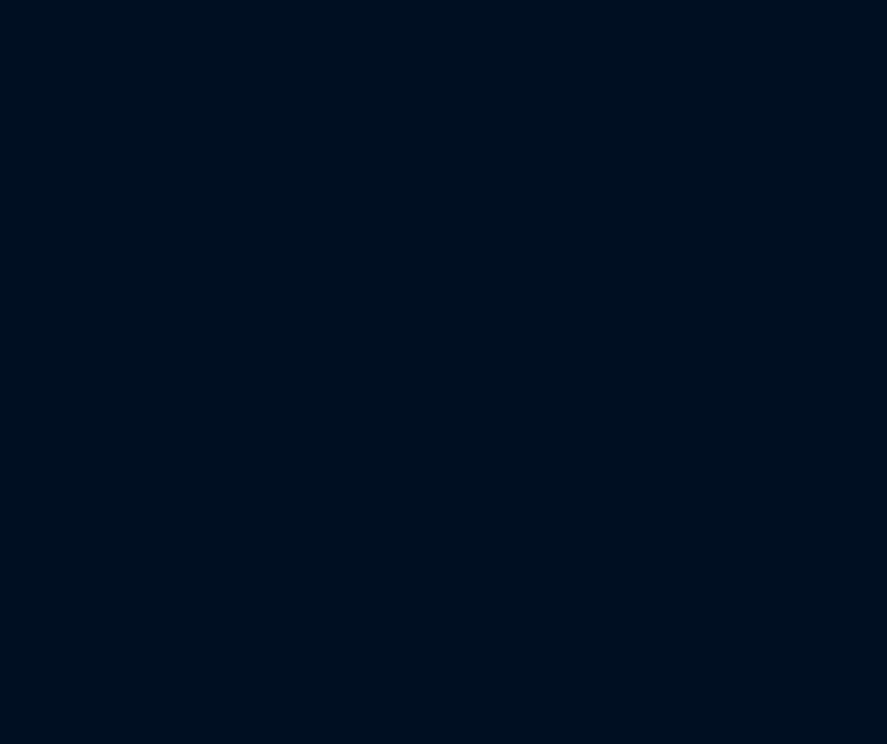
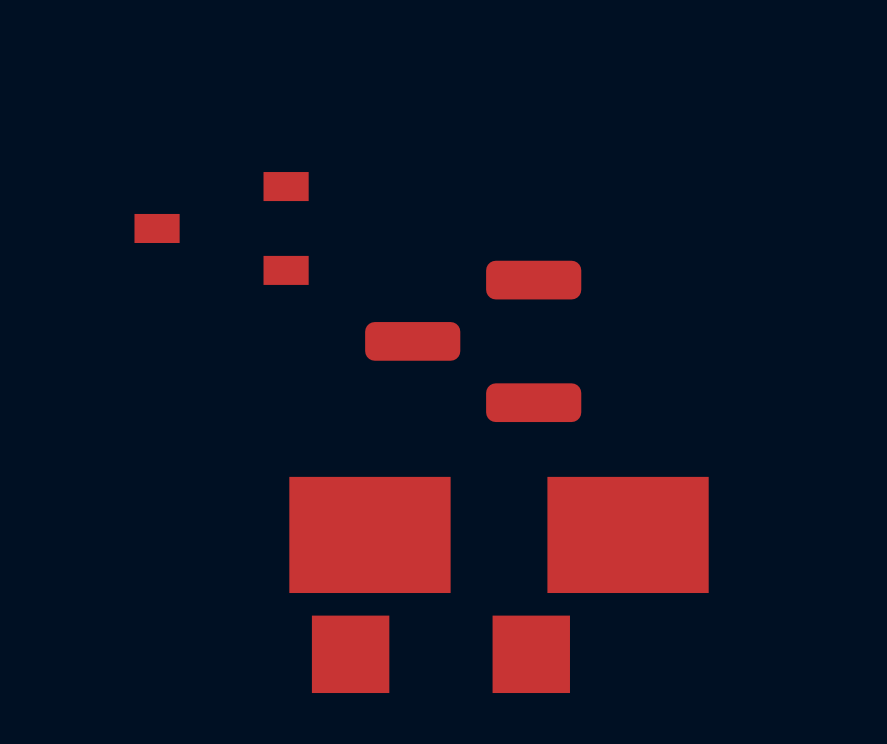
part: none -> (221, 228)
part: none -> (473, 341)
part: none -> (499, 534)
part: none -> (440, 654)

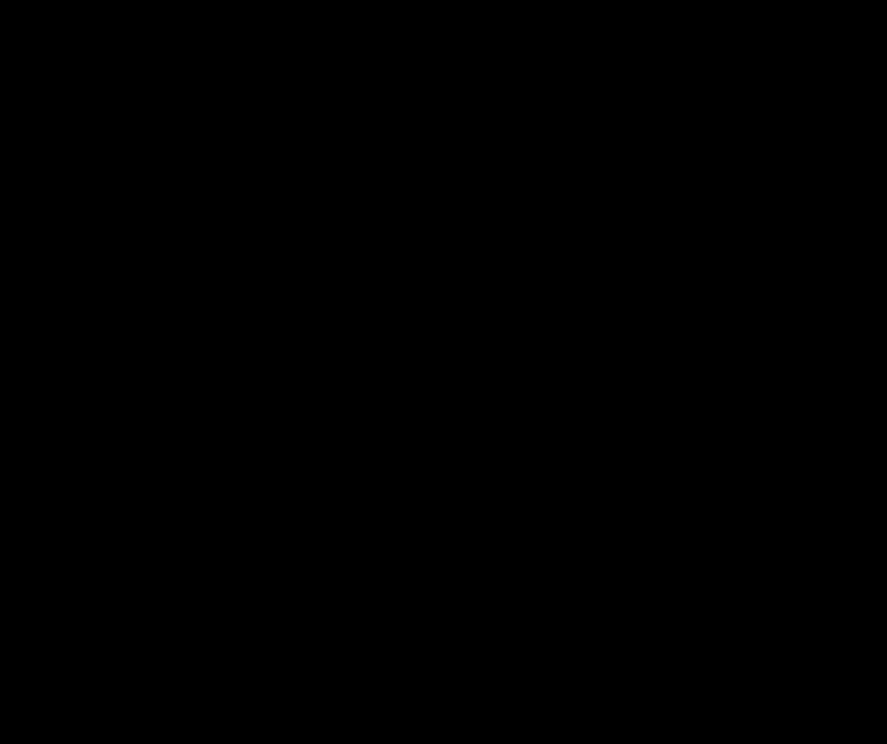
part: (221, 228) -> none
part: (473, 341) -> none
part: (499, 534) -> none
part: (440, 654) -> none

